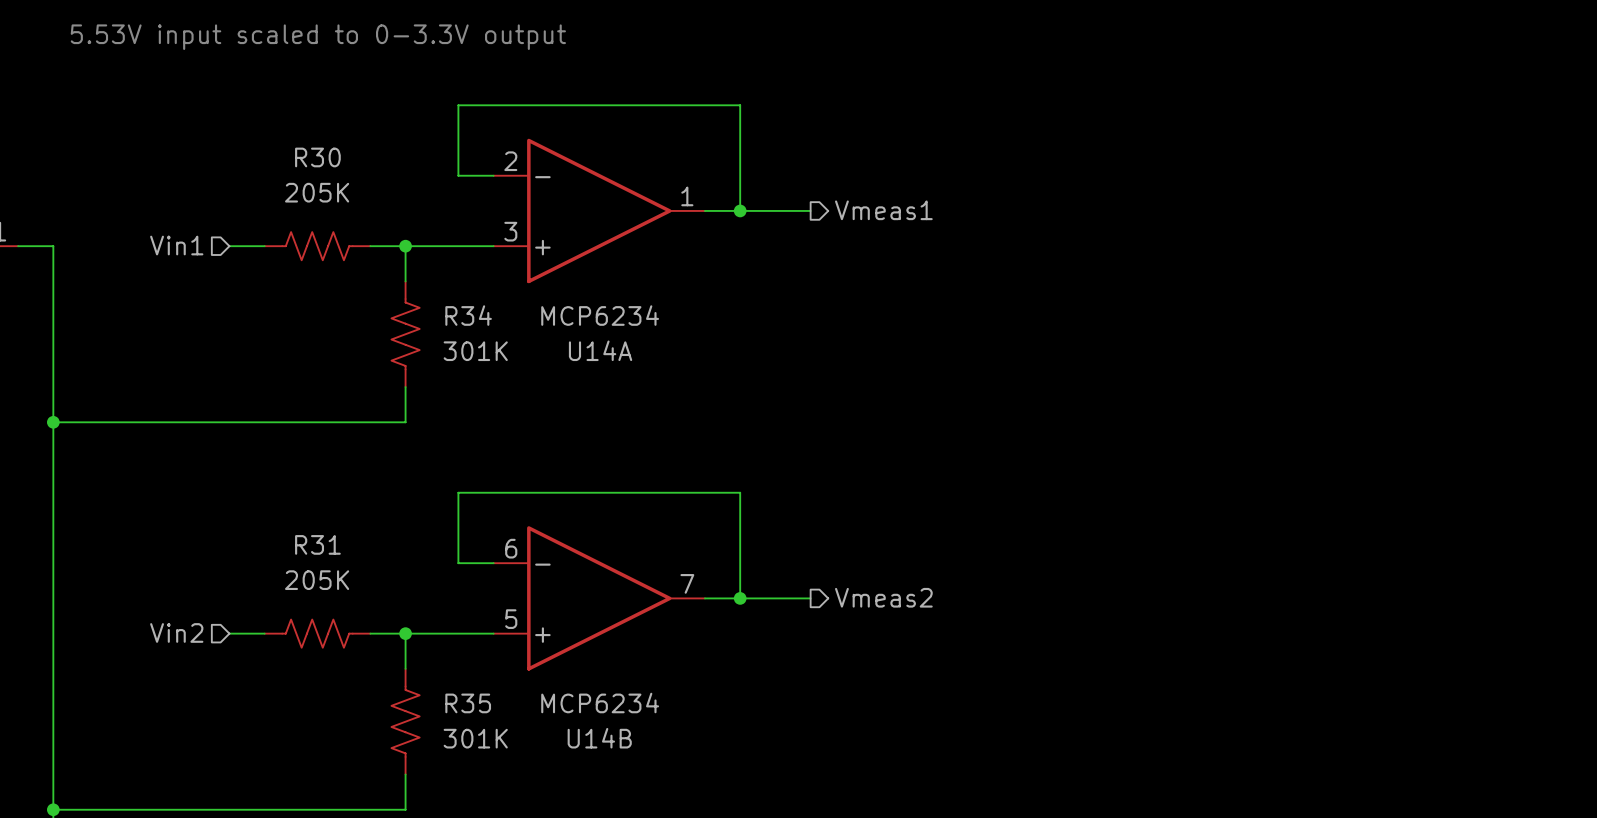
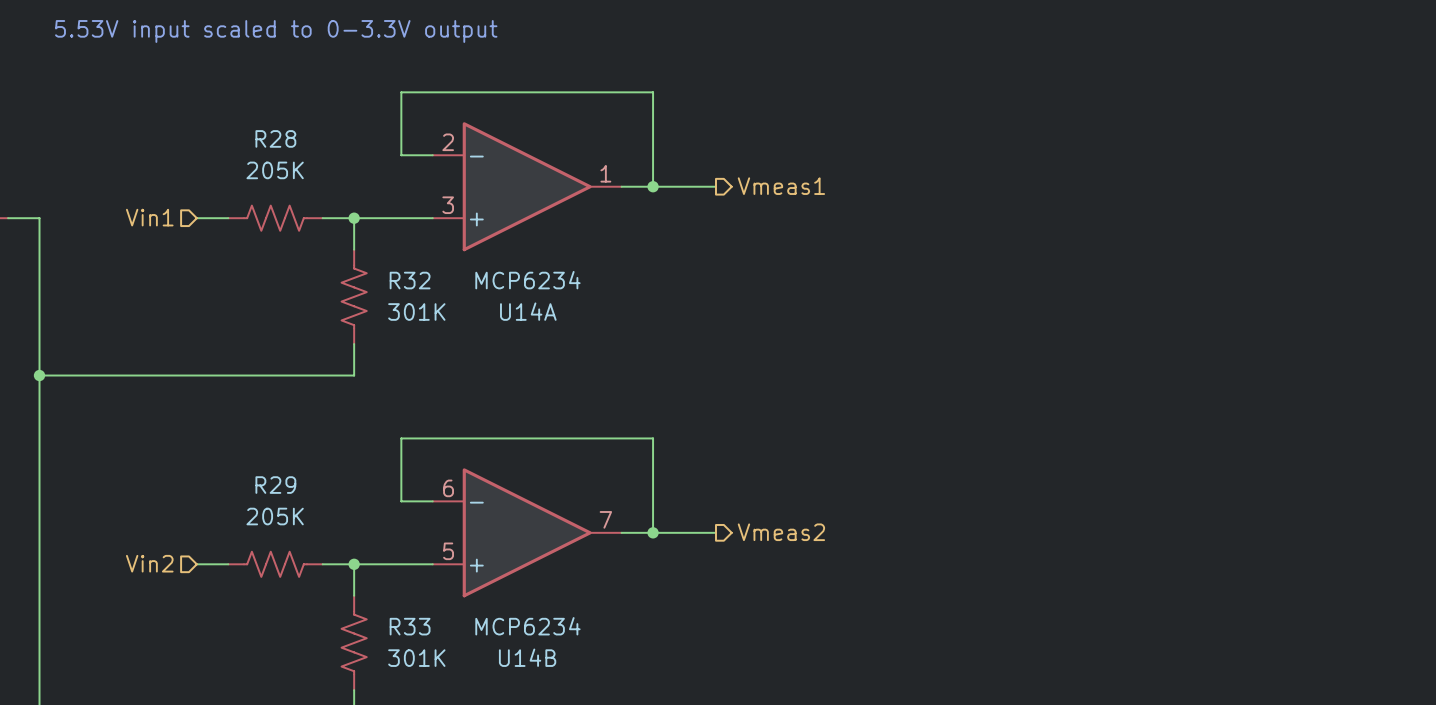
R30 name: R30 (317, 157) -> R28 (275, 138)
R34 name: R34 (468, 315) -> R32 (410, 280)
R31 name: R31 (317, 544) -> R29 (275, 485)
R35 name: R35 (468, 703) -> R33 (410, 626)

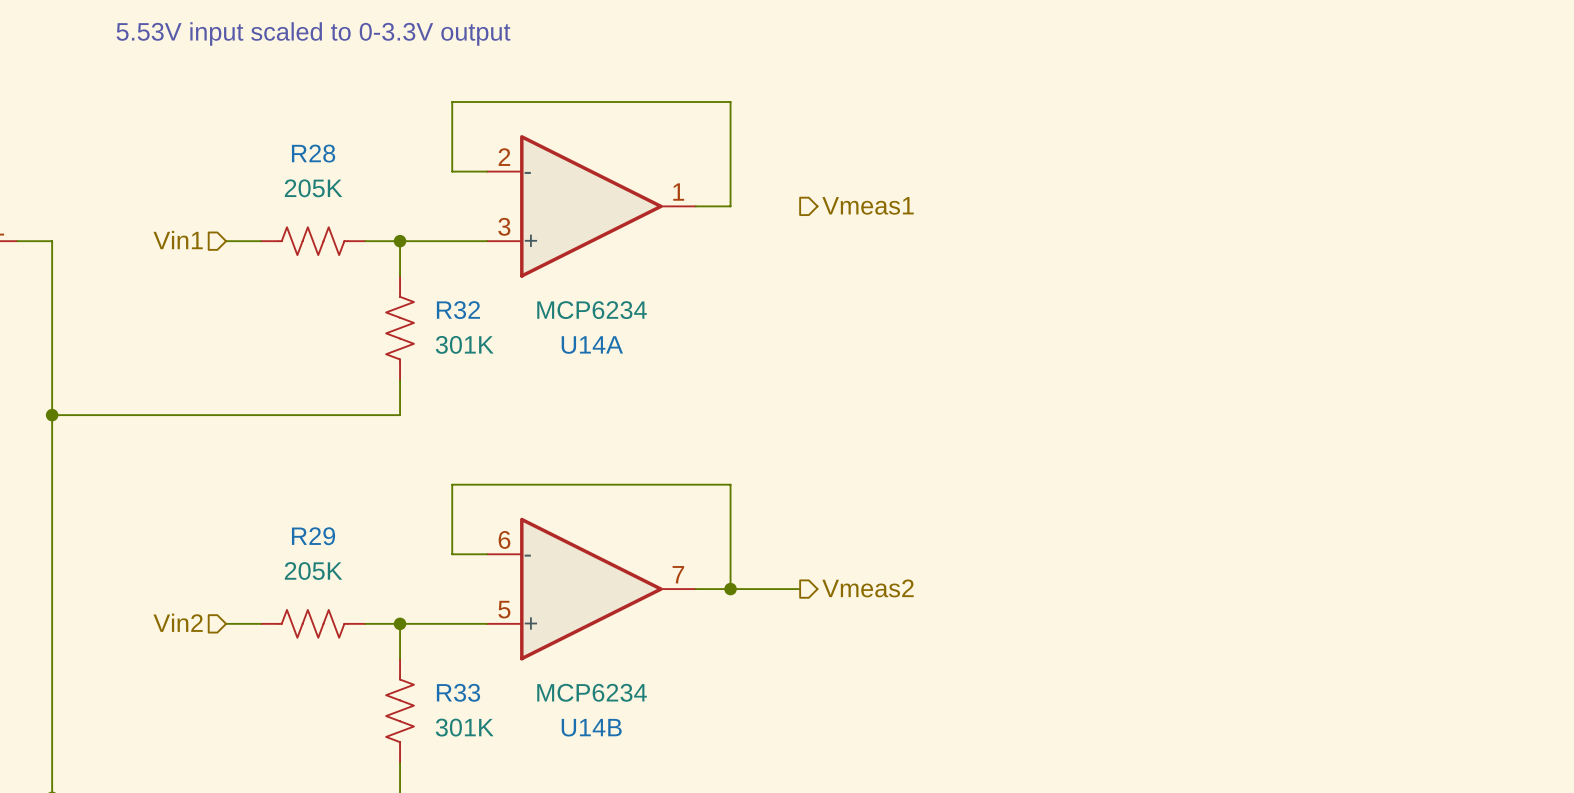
wire: (653, 186) (715, 186) -> none
junction: (653, 186) -> none

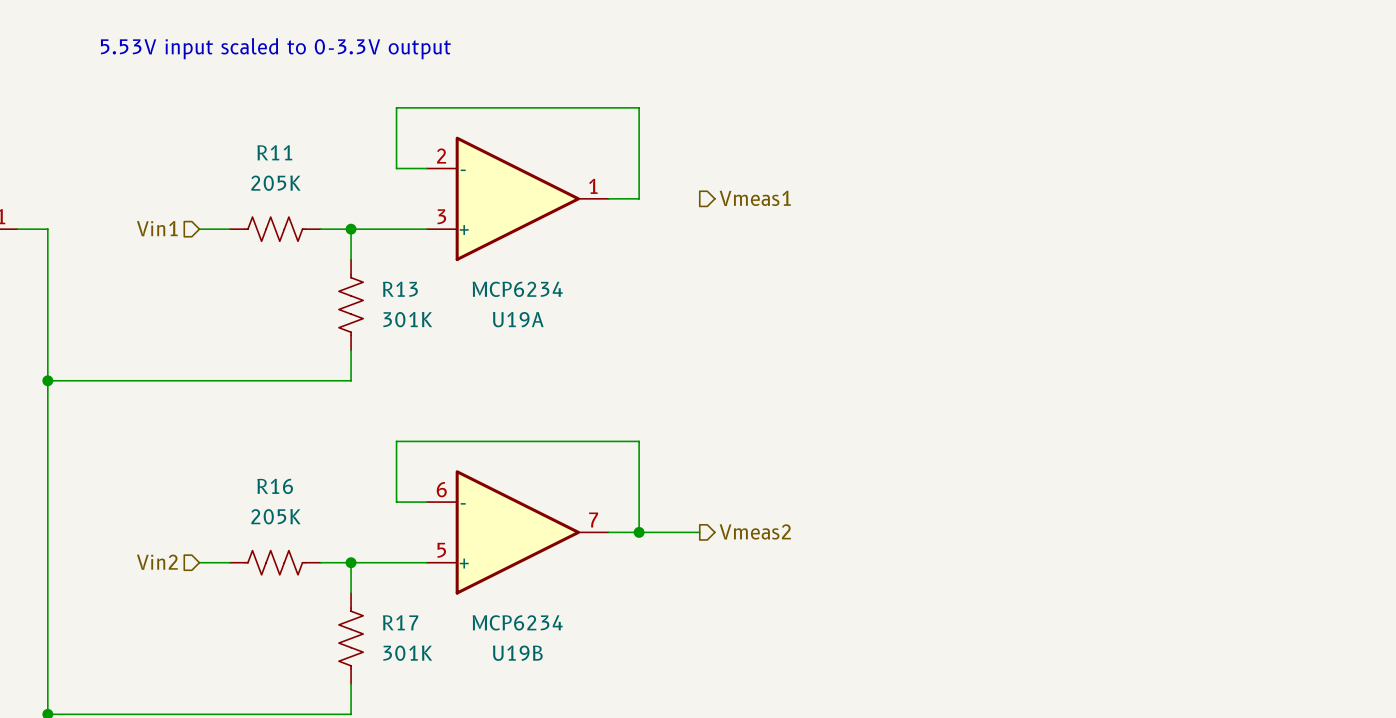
R28 name: R28 (313, 153) -> R11 (274, 152)
R32 name: R32 (458, 310) -> R13 (400, 289)
U14A name: U14A (592, 345) -> U19A (518, 319)
R29 name: R29 (313, 536) -> R16 (275, 486)
R33 name: R33 (458, 692) -> R17 (400, 622)
U14B name: U14B (591, 727) -> U19B (517, 653)

